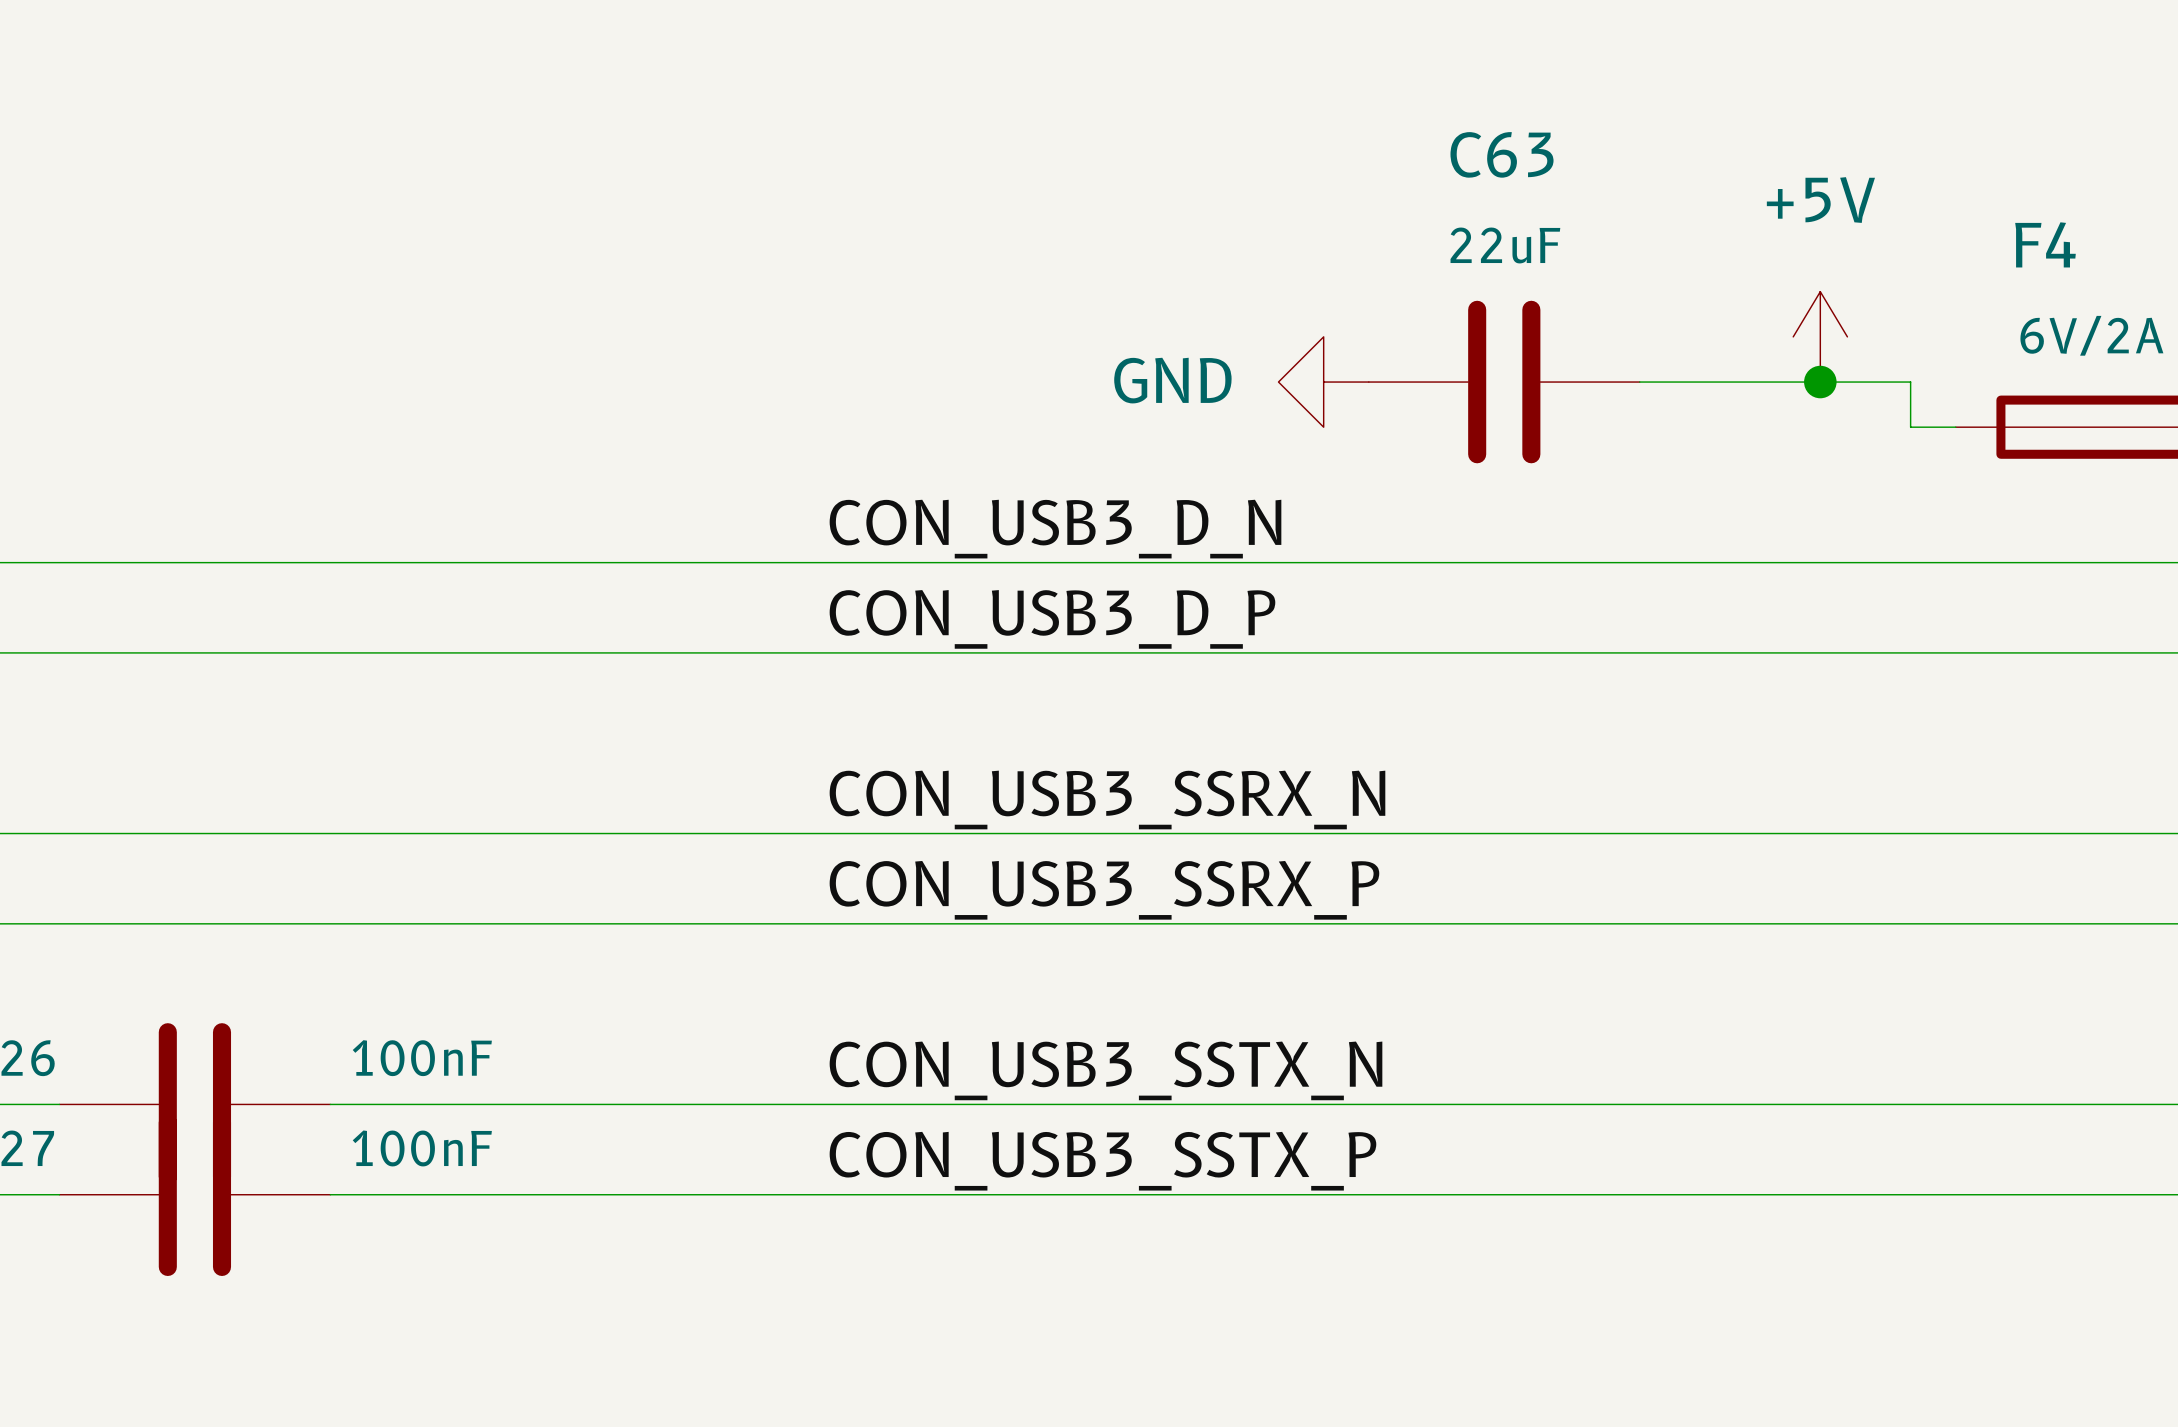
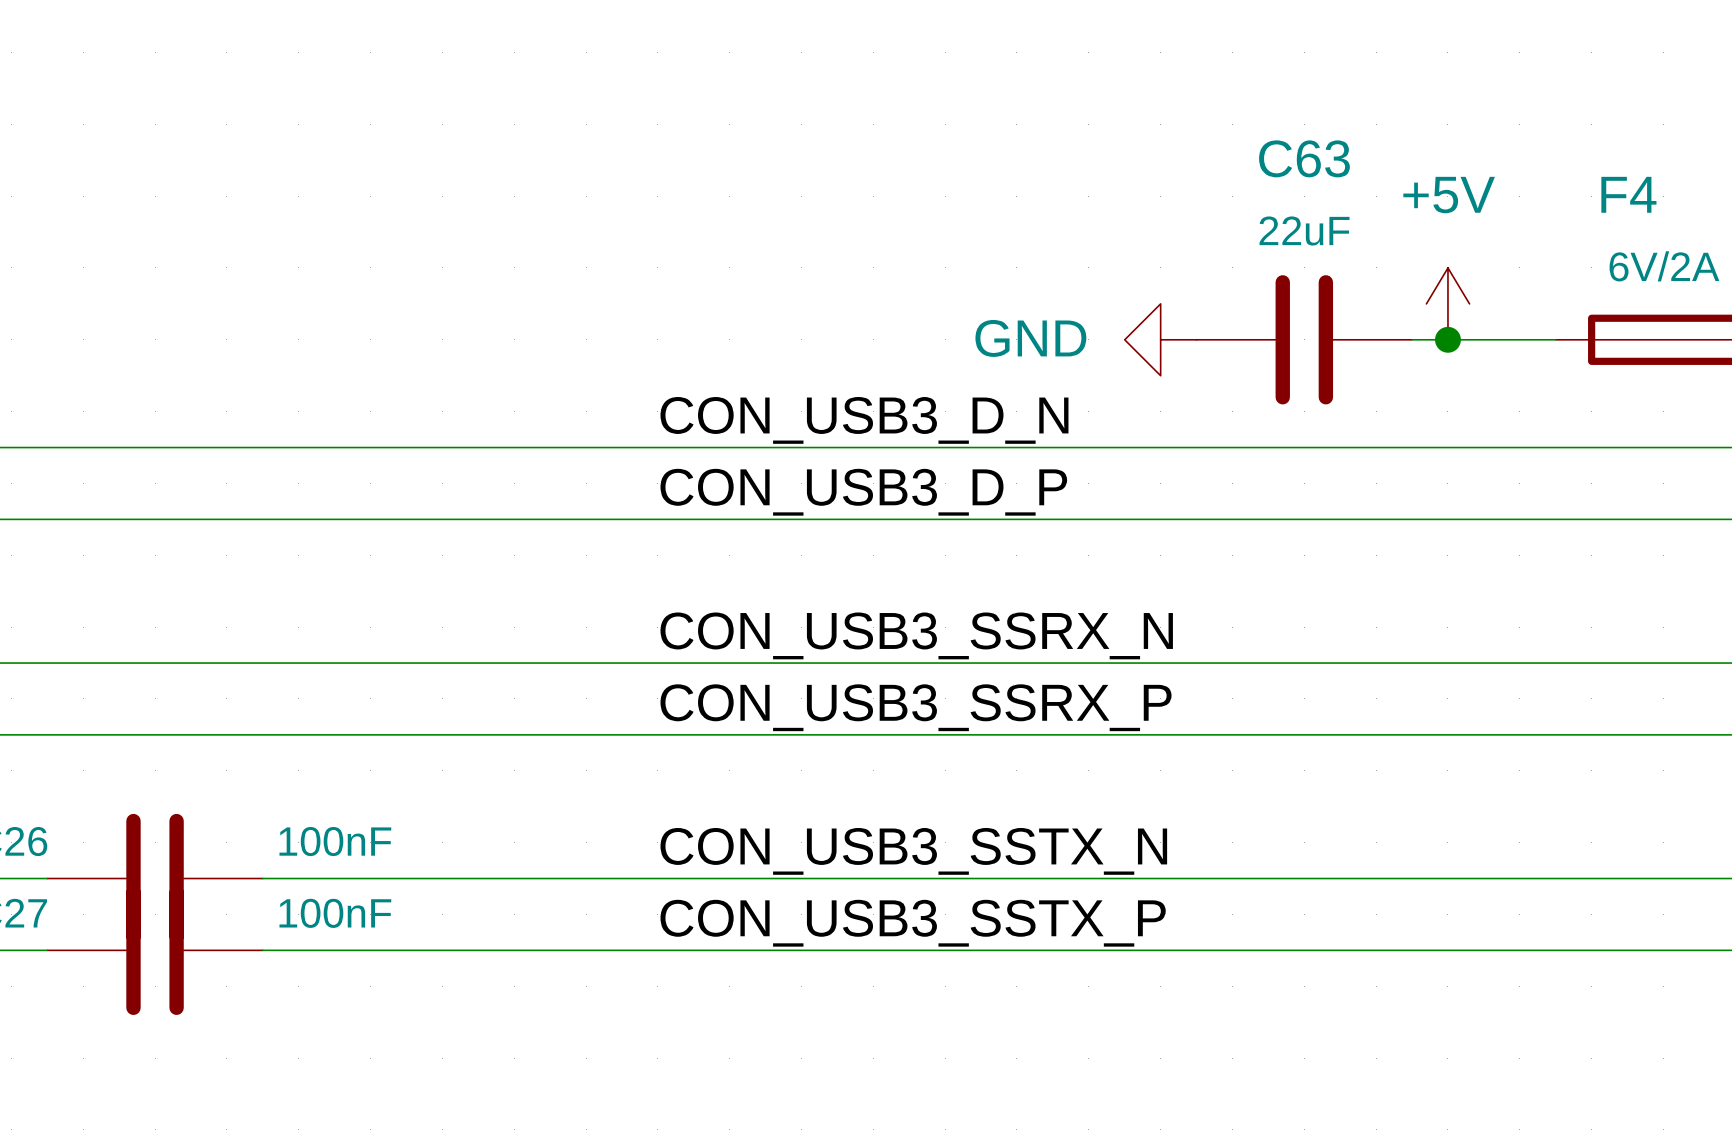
power symbol position: +5V (1820, 336) -> +5V (1447, 303)
power symbol position: GND (1323, 382) -> GND (1160, 339)
C63 position: (1504, 382) -> (1304, 339)
wire: (1639, 382) (1910, 382) (1910, 427) -> (1412, 339) (1519, 339)
junction position: (1820, 382) -> (1447, 339)

